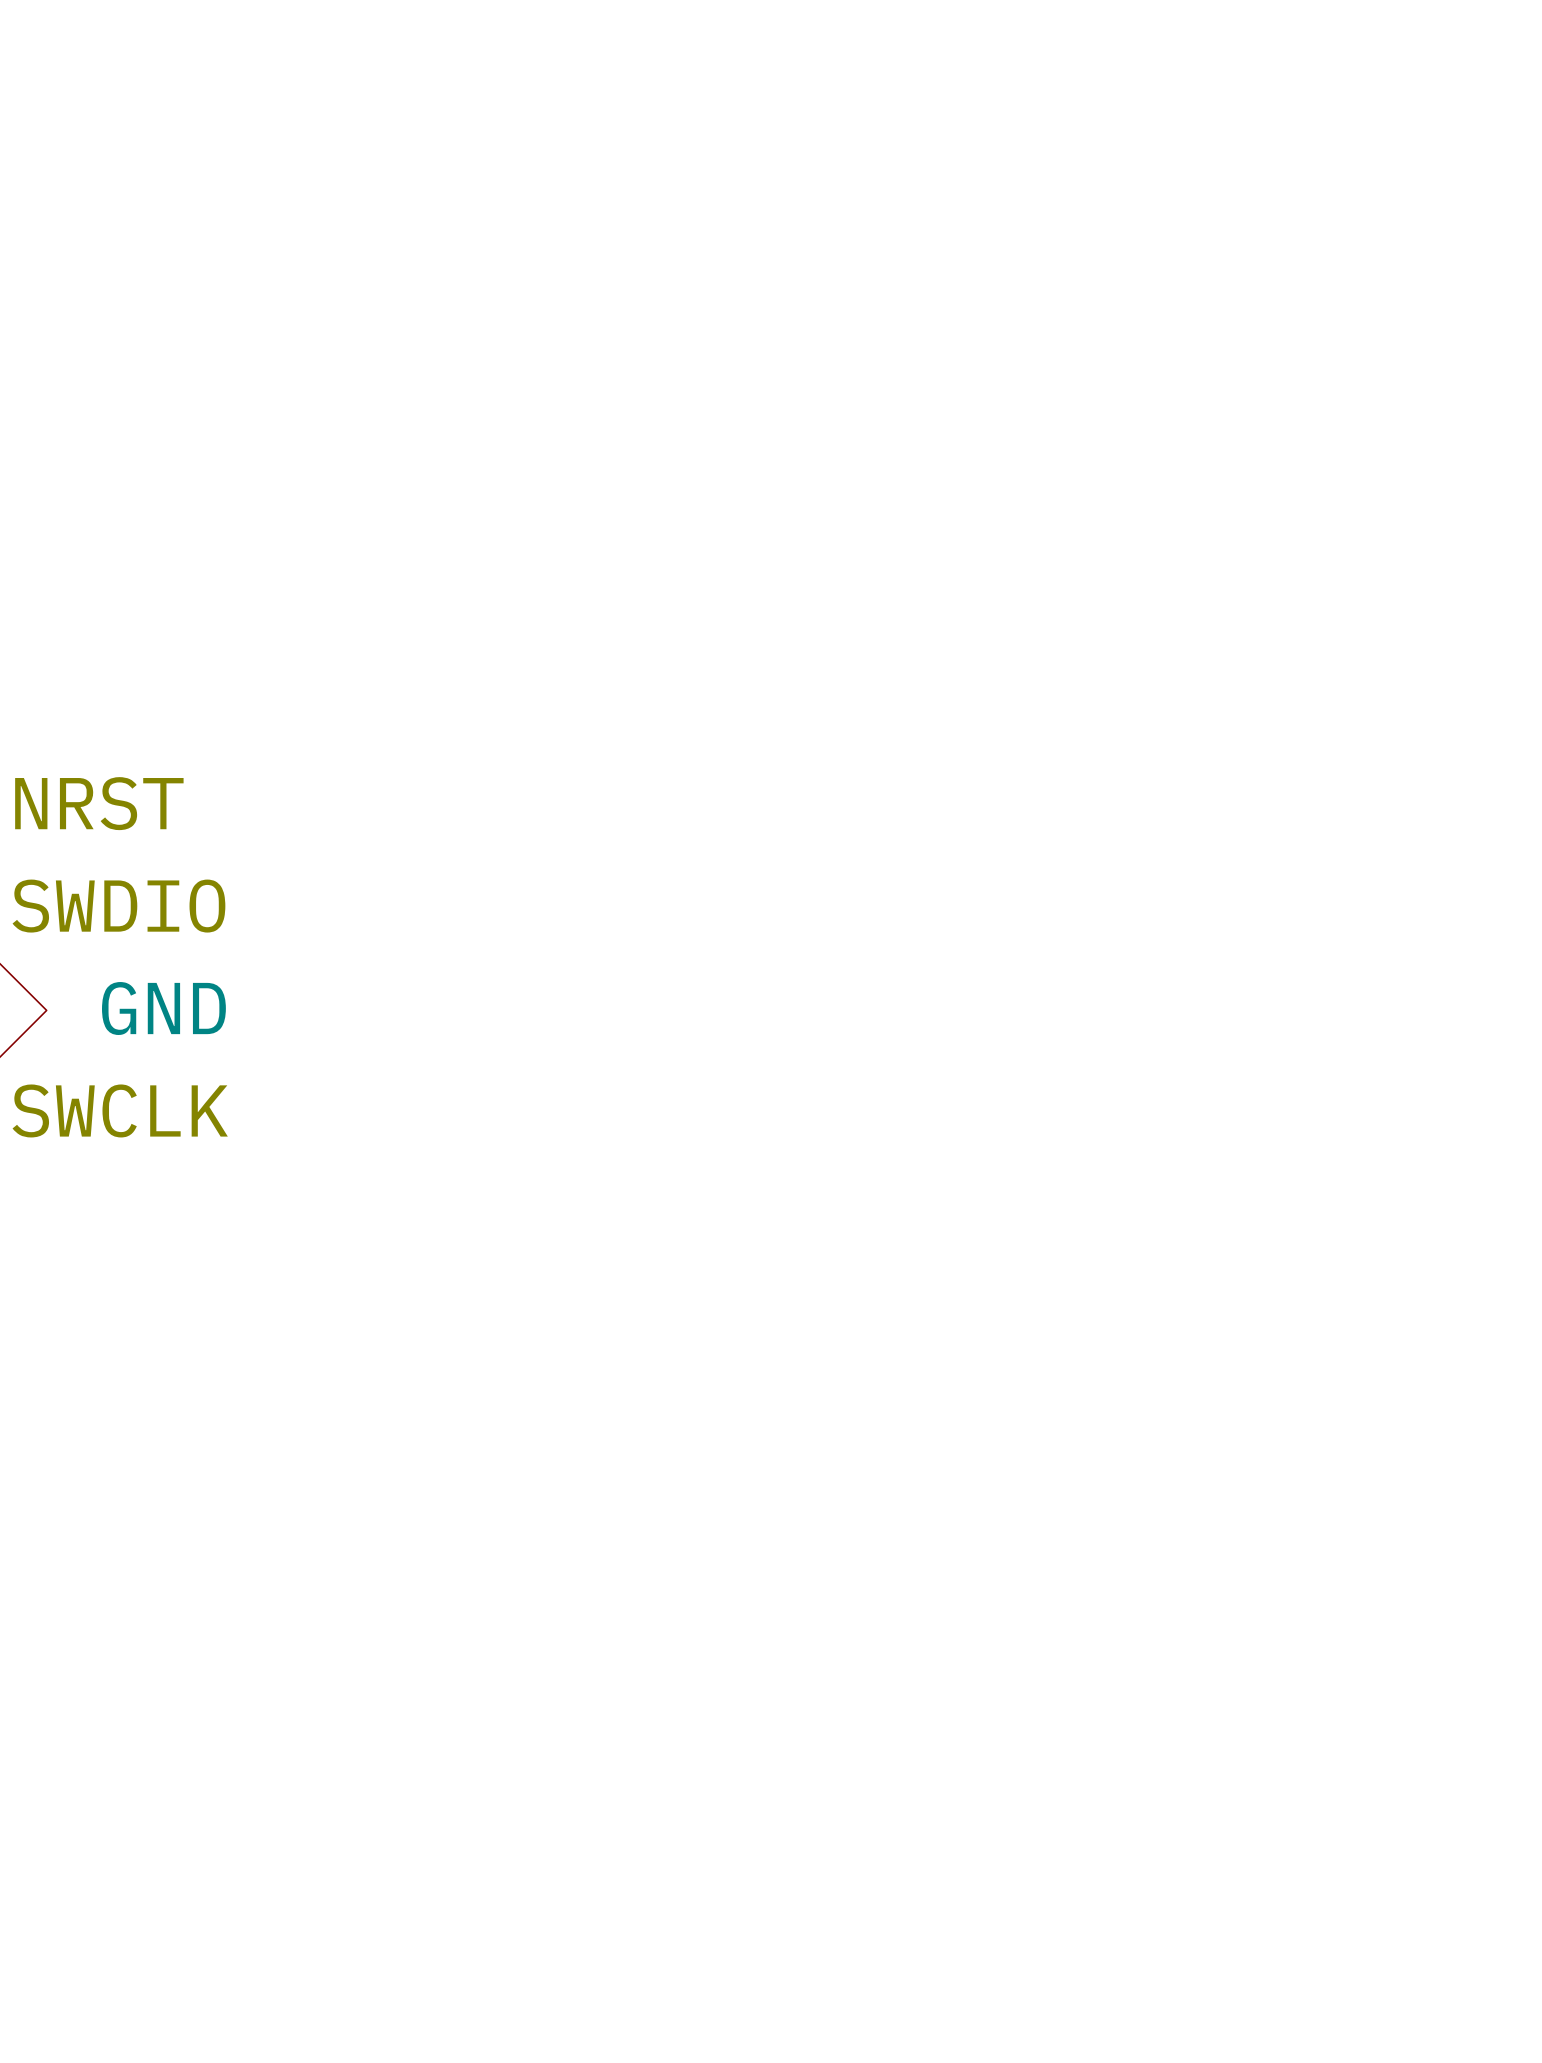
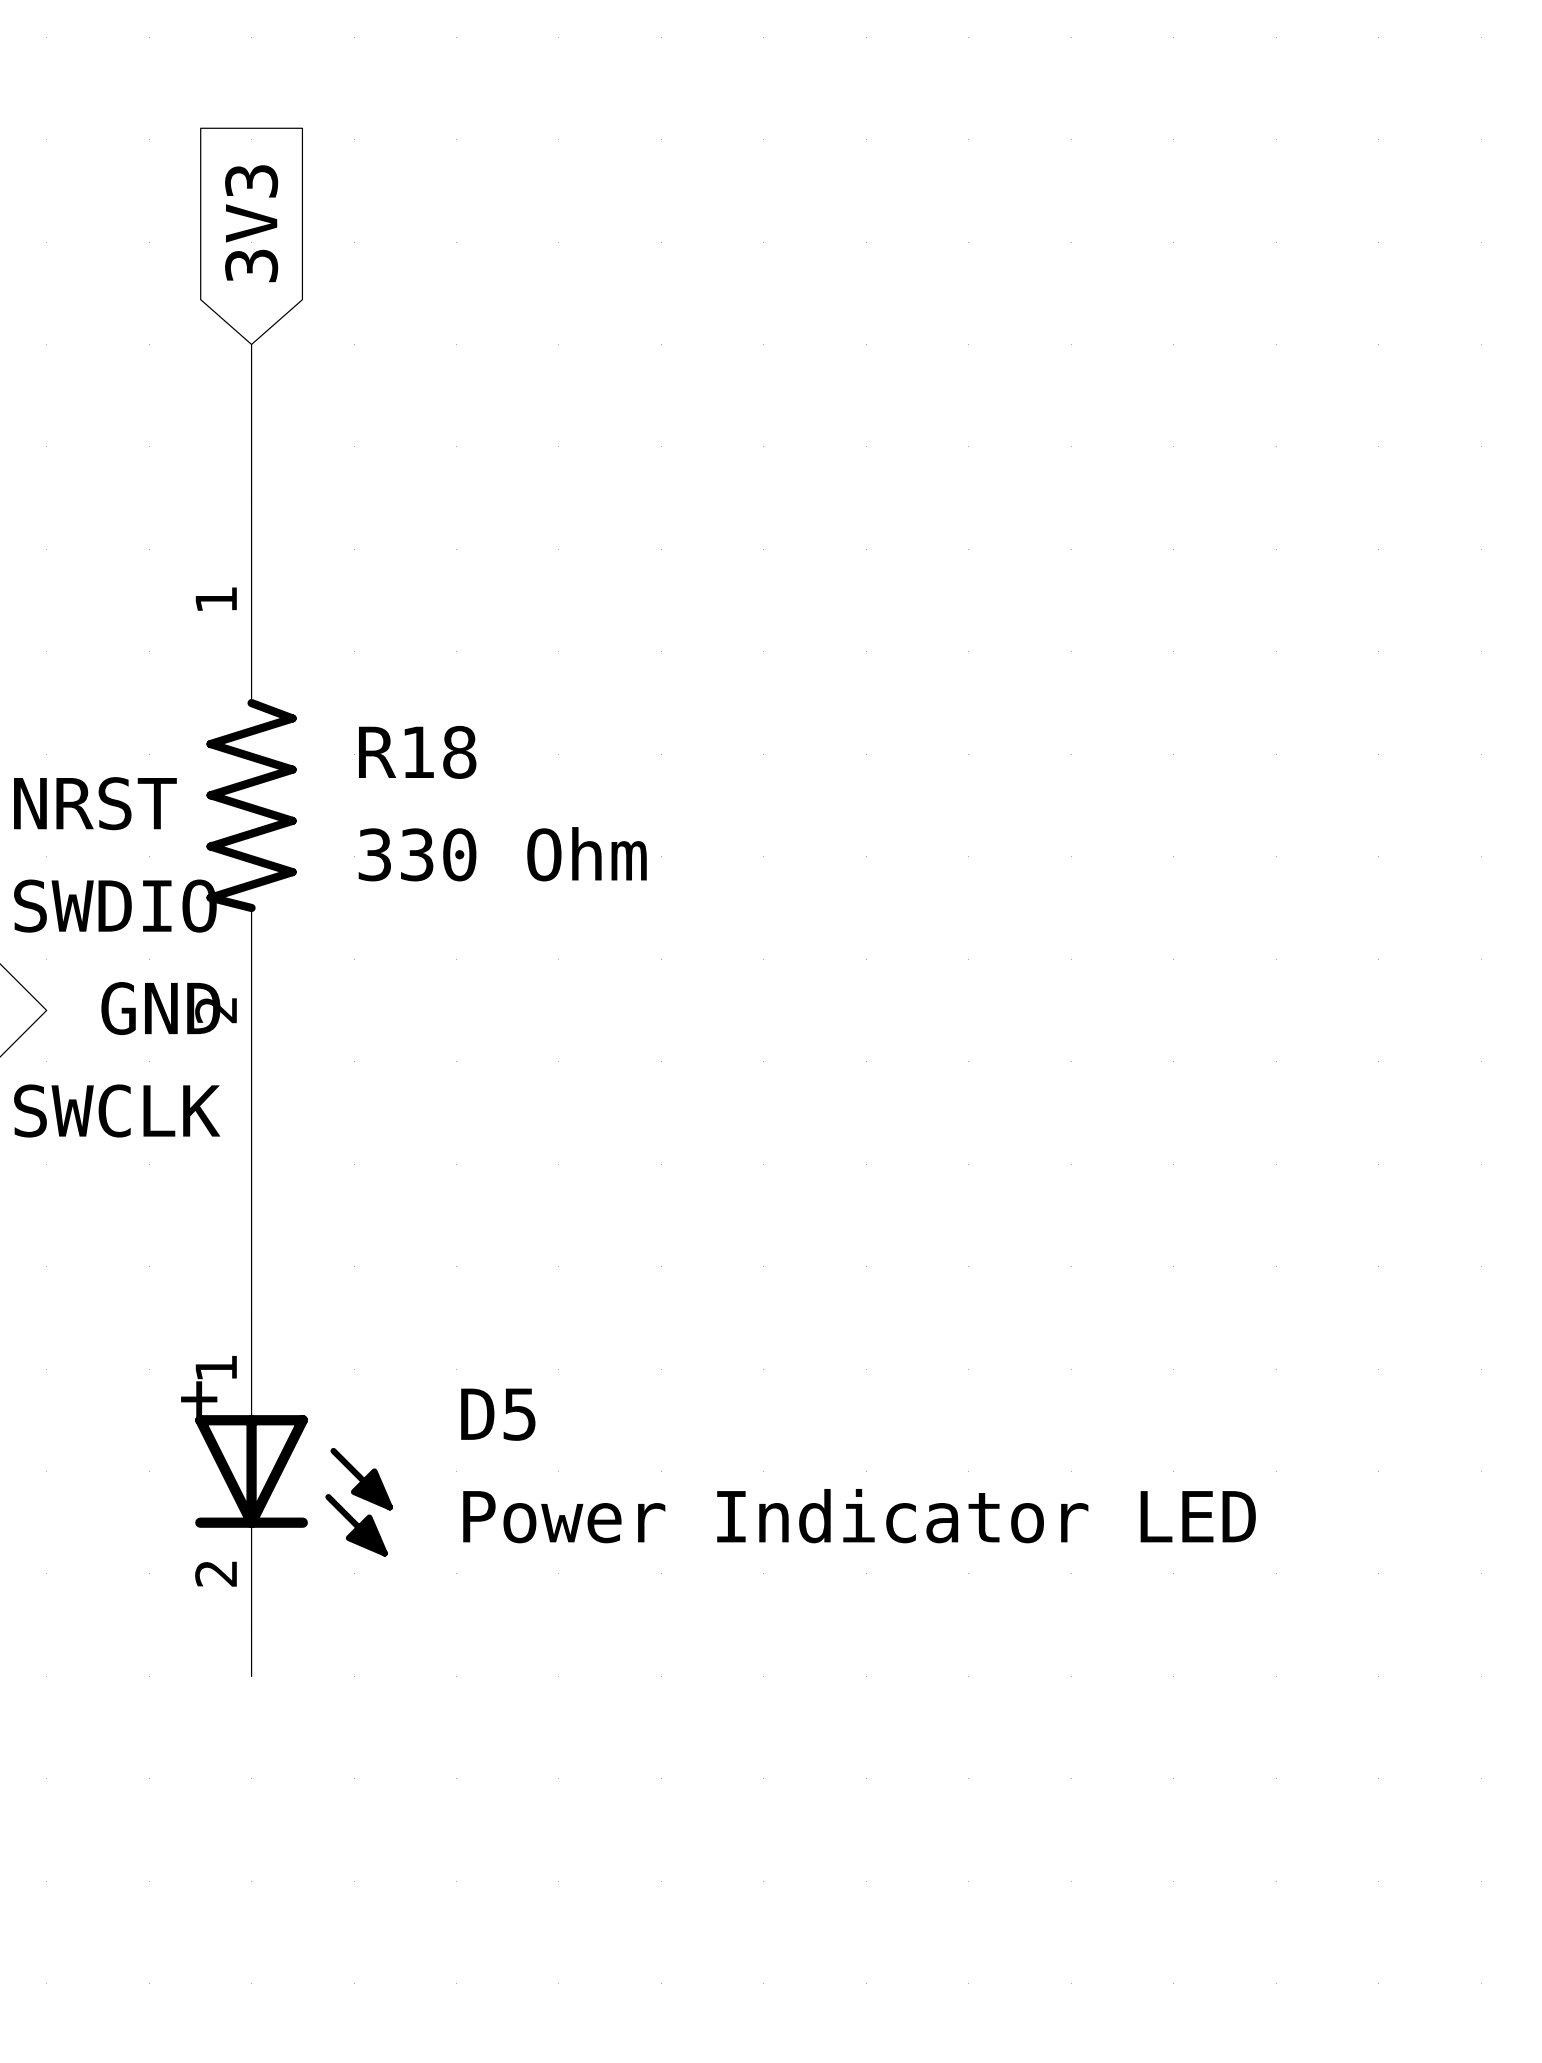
global label: none -> 3V3 (251, 223)
wire: none -> (251, 344) (251, 498)
R18: none -> 330 Ohm (251, 805)
wire: none -> (251, 1112) (251, 1317)
D5: none -> Power Indicator LED (294, 1471)
wire: none -> (251, 1625) (251, 1676)

